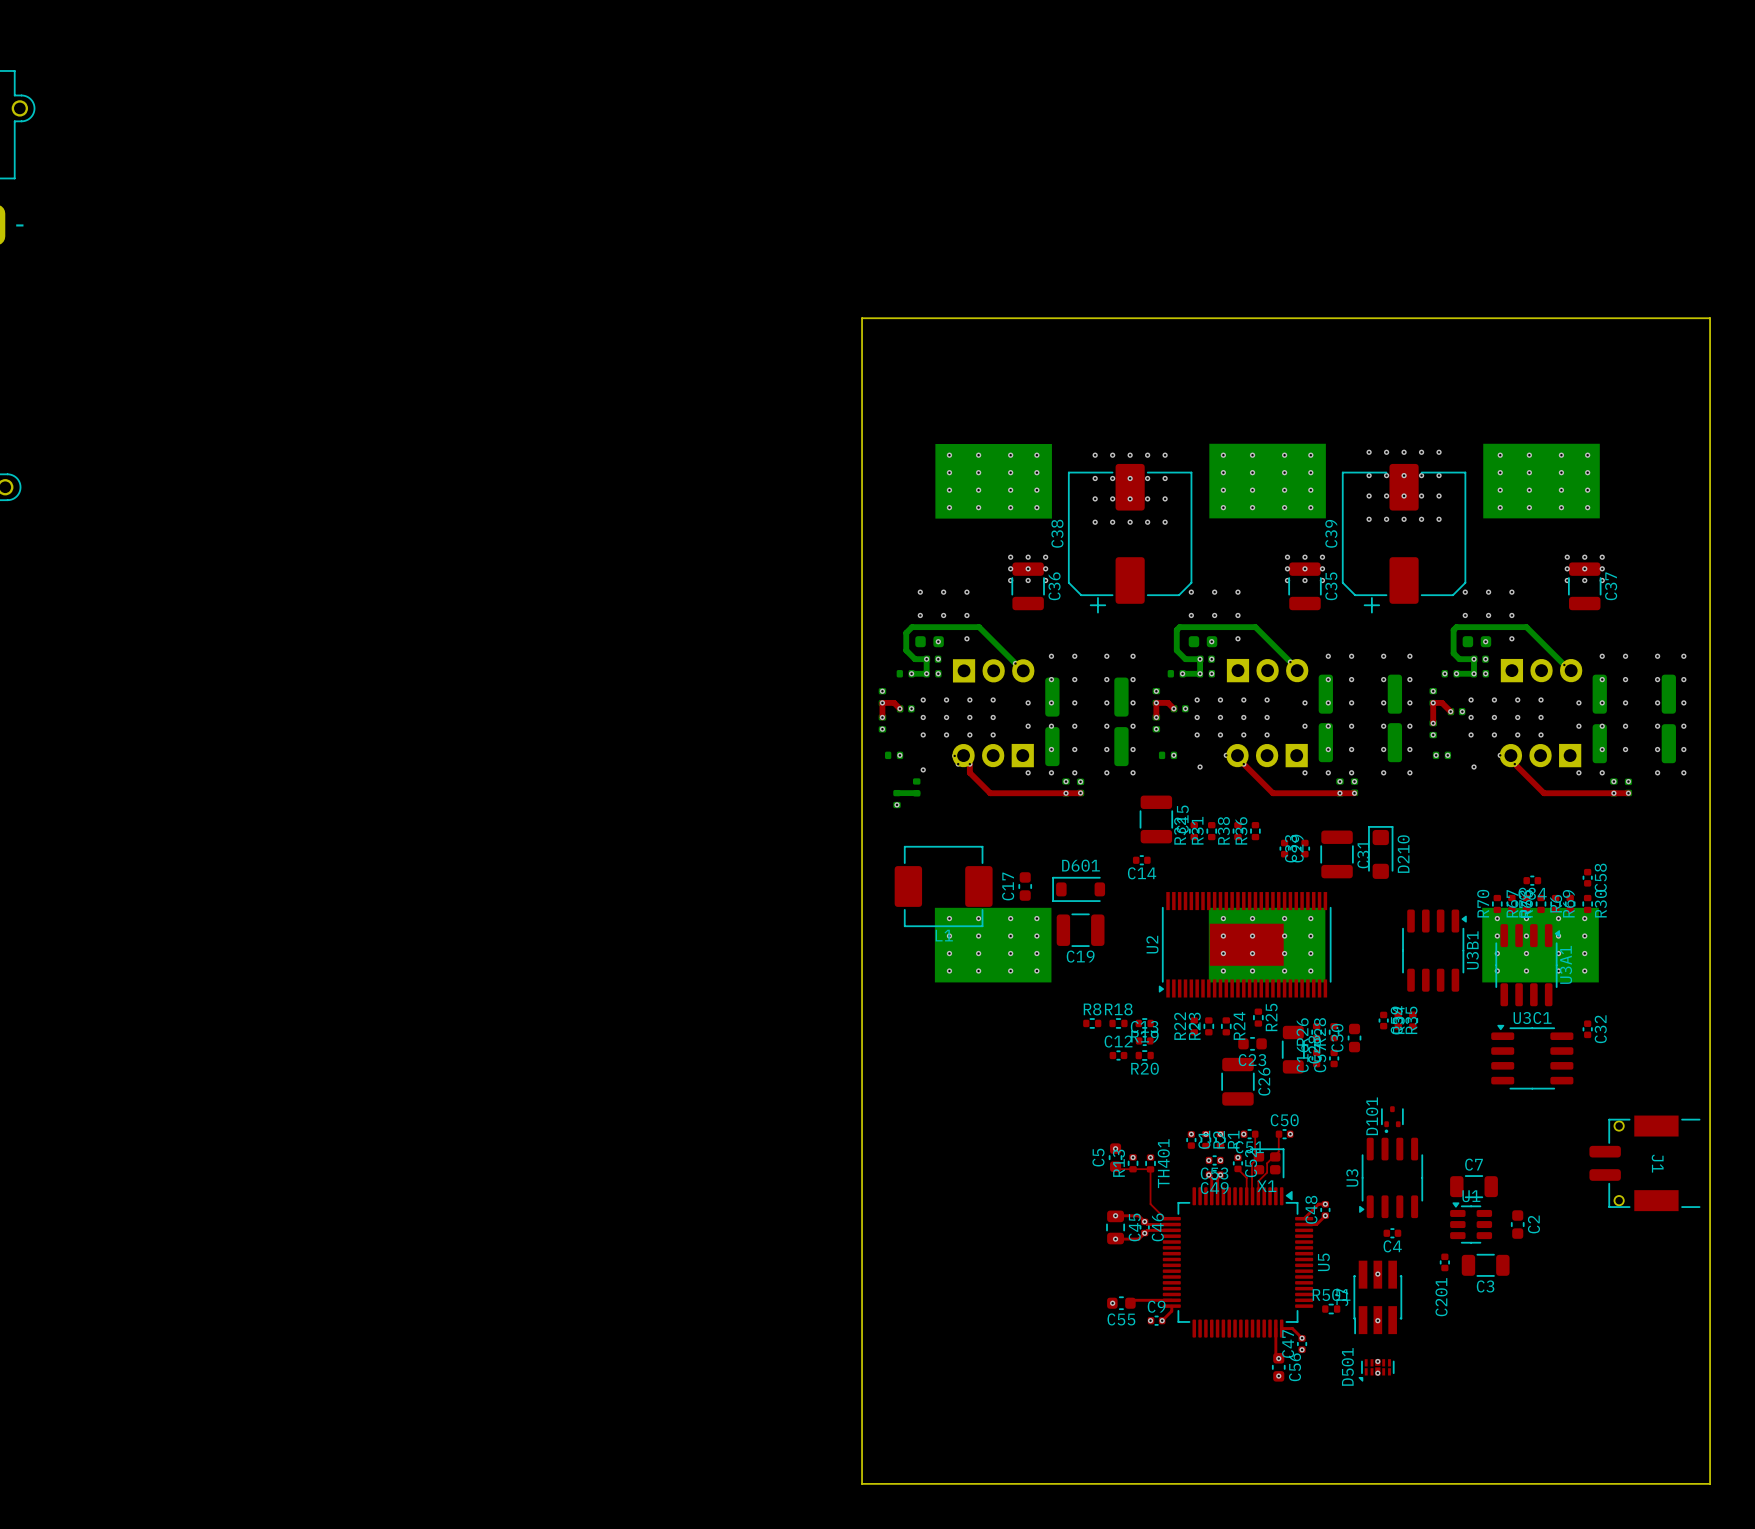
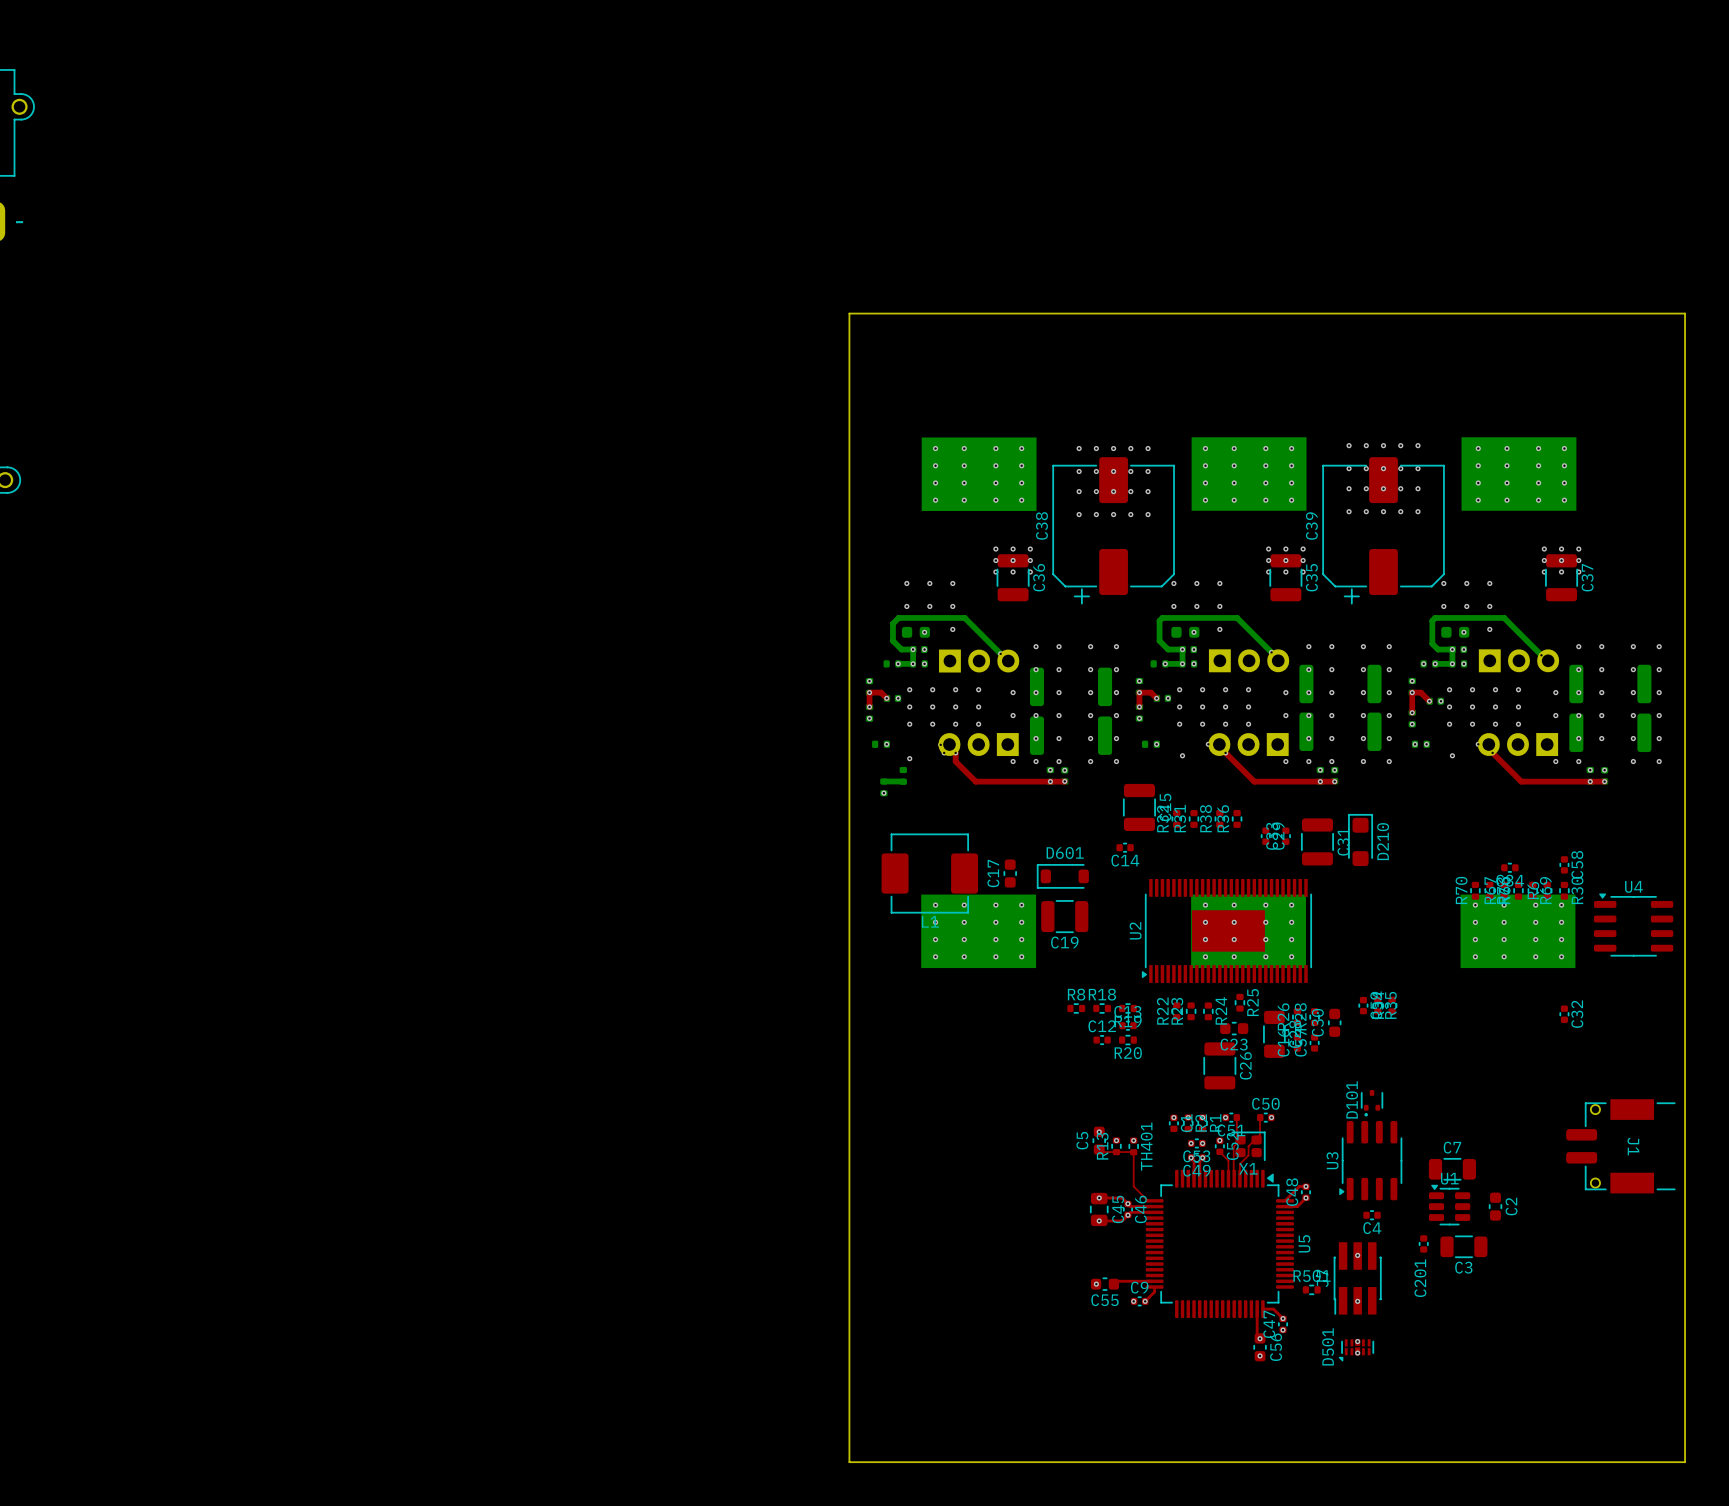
U4: none -> (1633, 924)
U3B1: (1434, 950) -> none
U3A1: (1527, 965) -> none
U3C1: (1532, 1057) -> none

